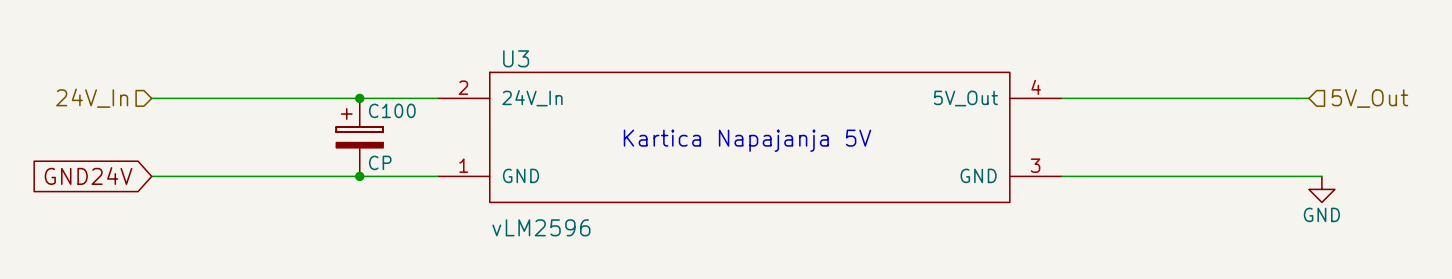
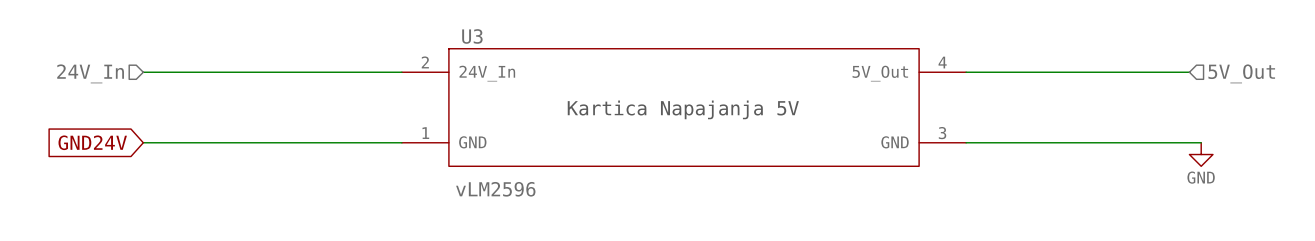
junction: (359, 98) -> none
C100: CP (359, 137) -> none
junction: (359, 176) -> none

